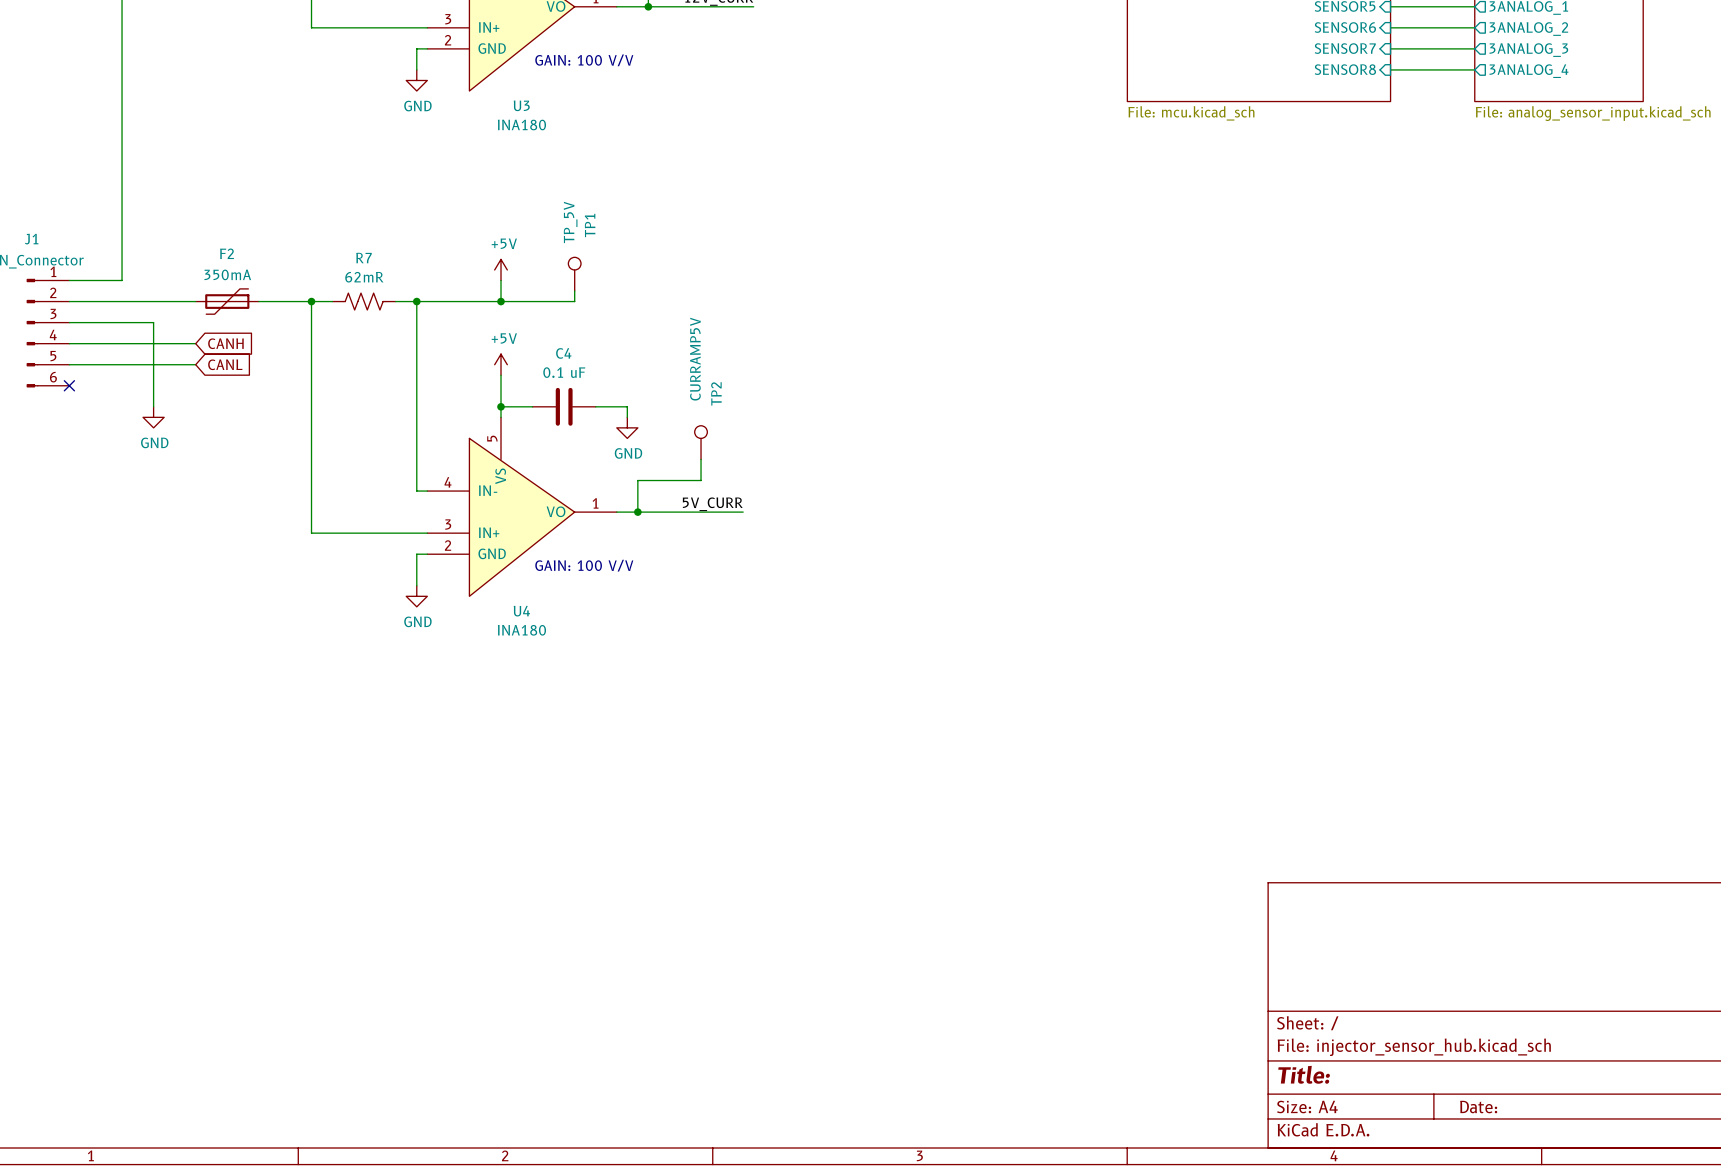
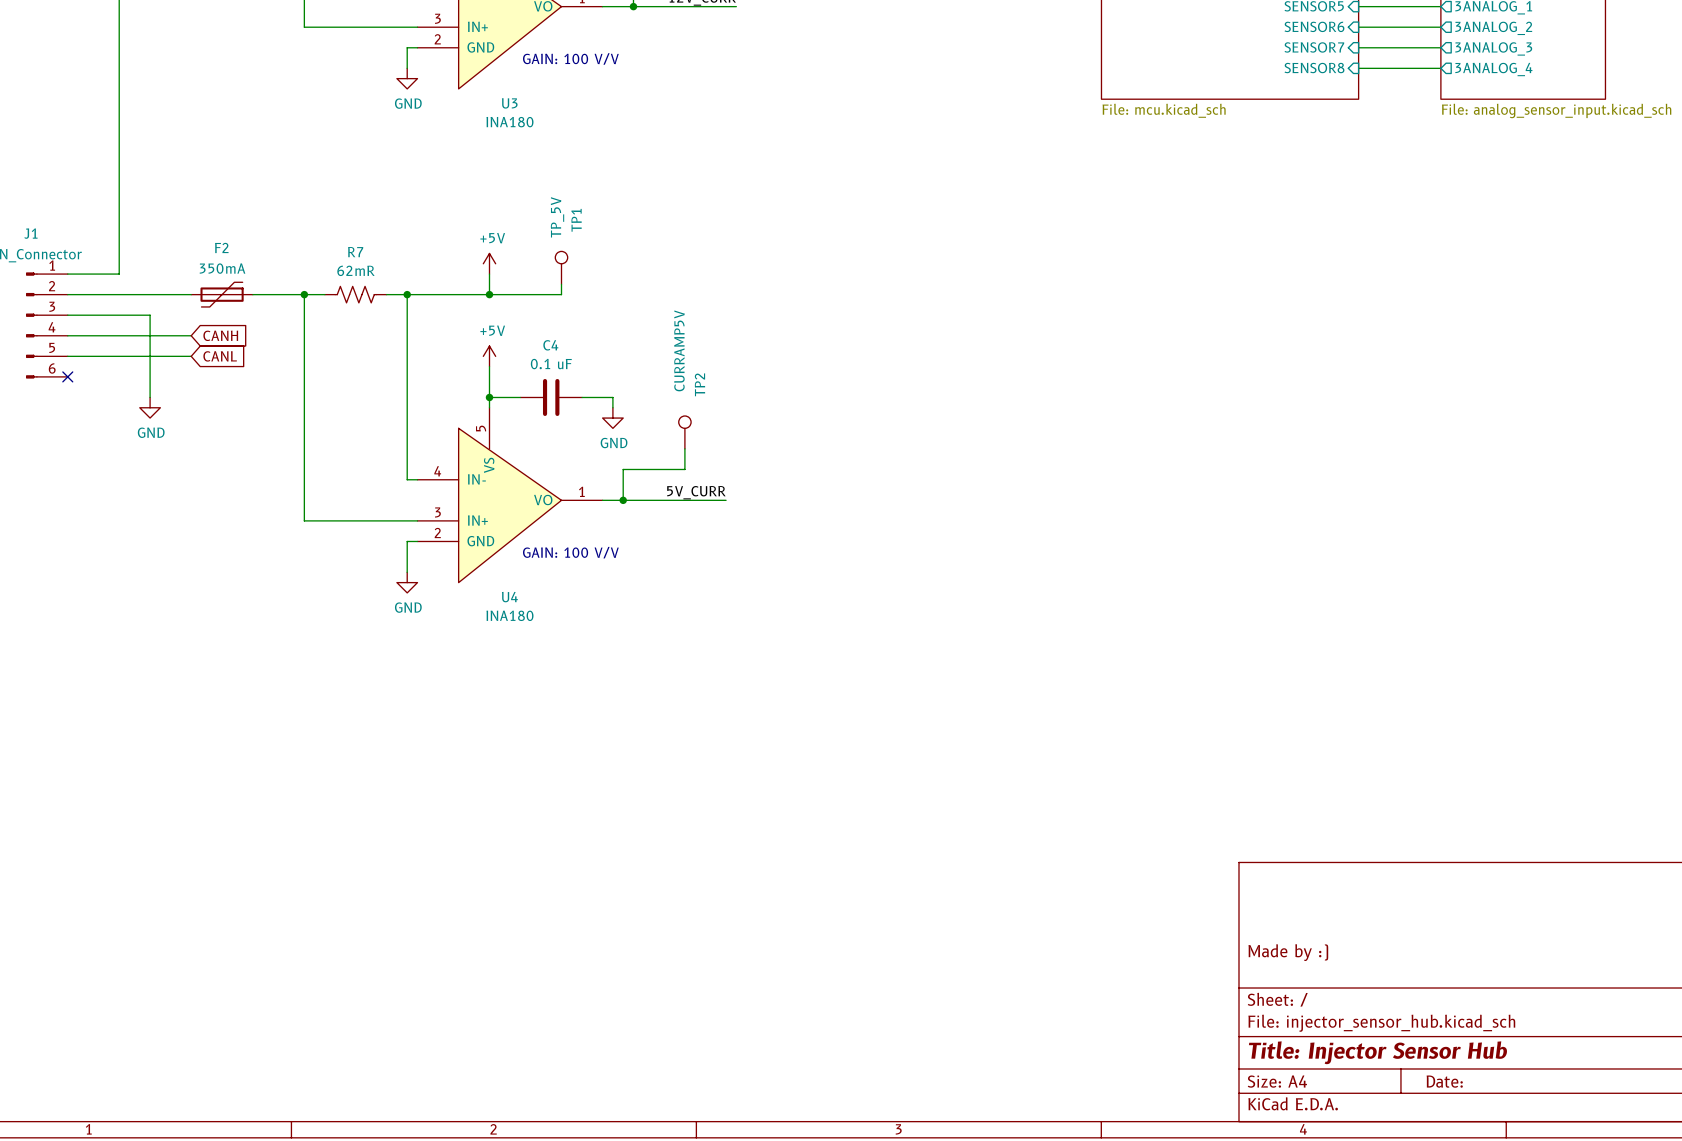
title block: none -> Made by :) (1288, 952)
title block: Title: (1304, 1074) -> Title: Injector Sensor Hub (1378, 1052)

